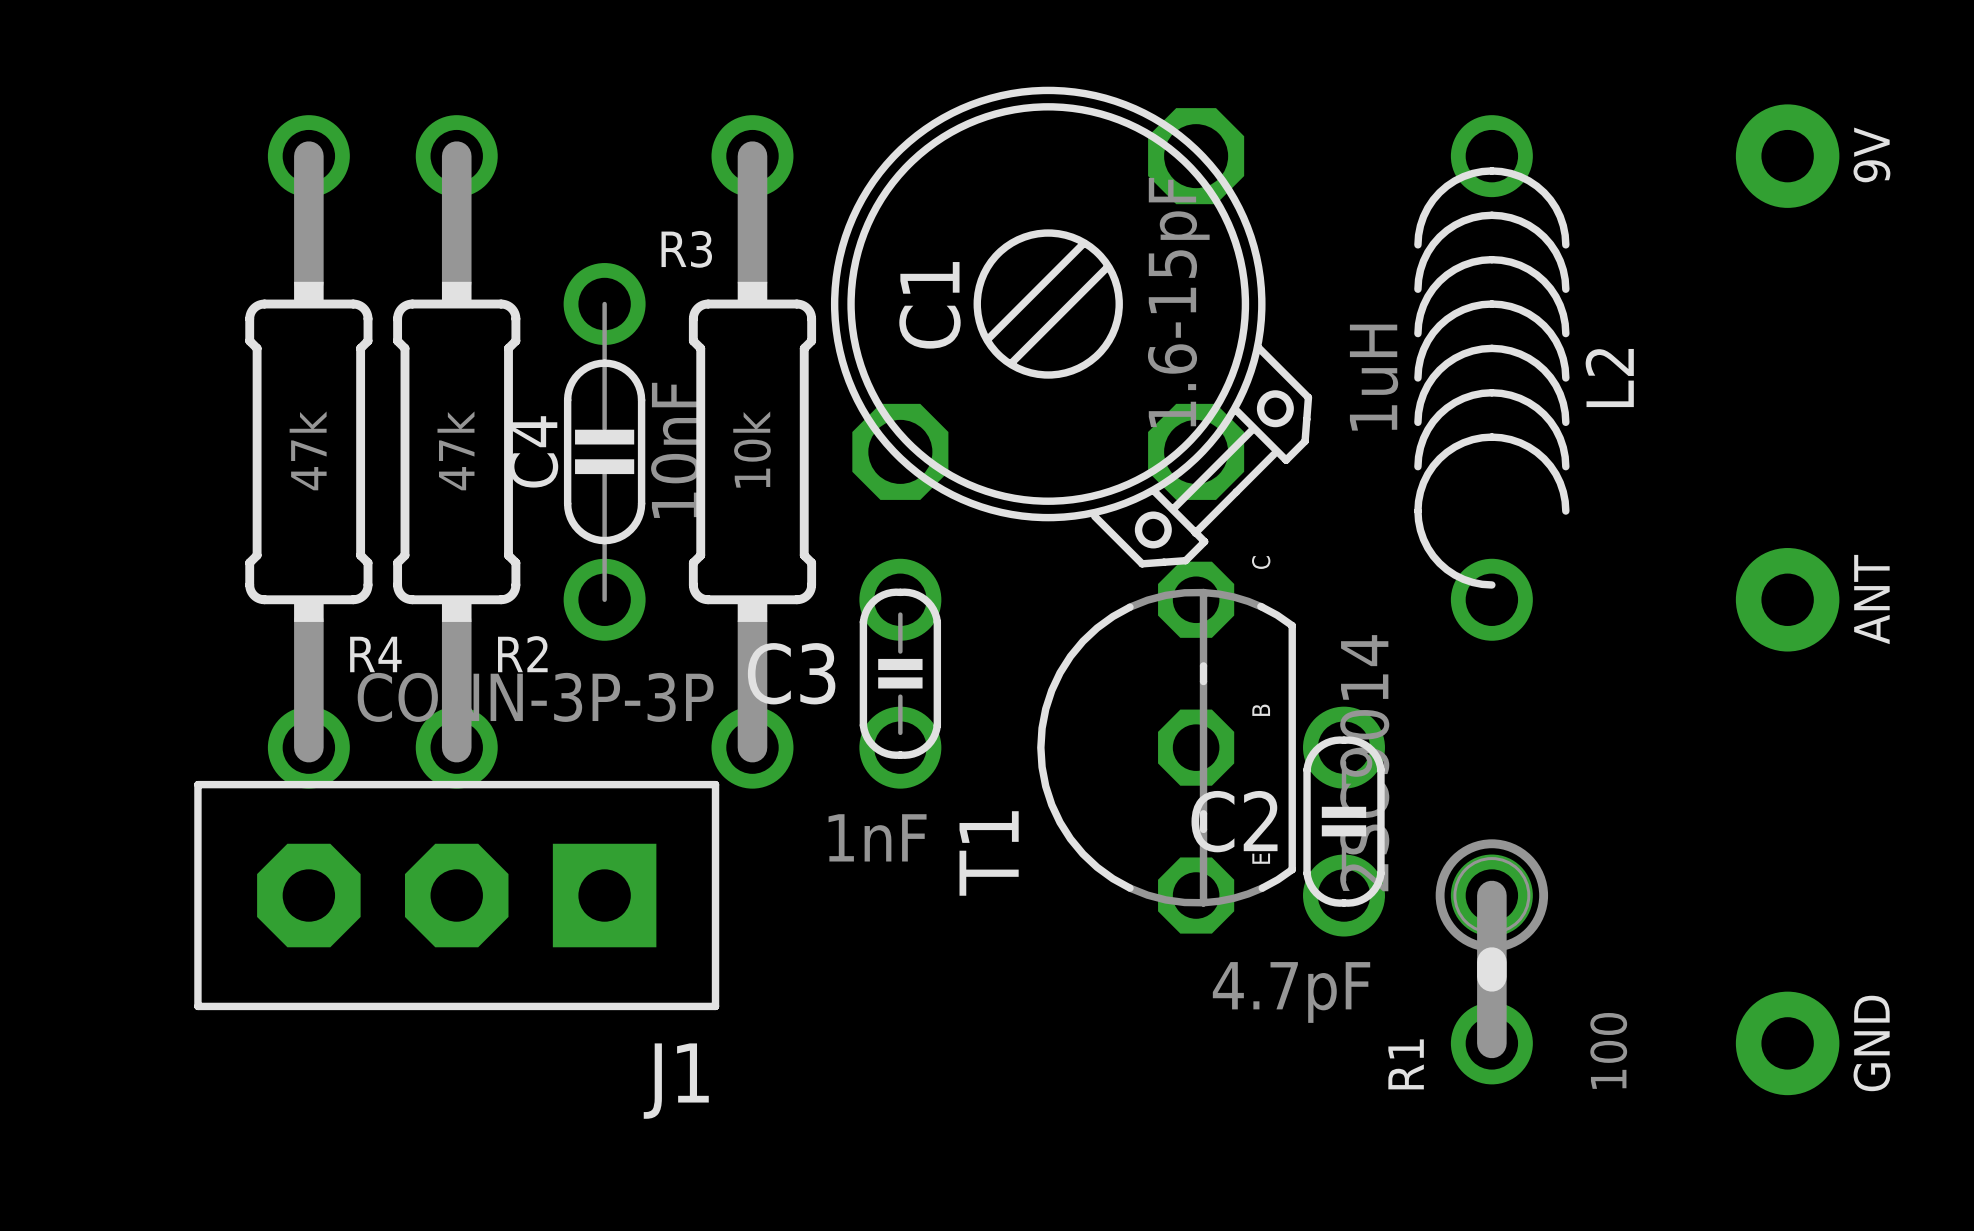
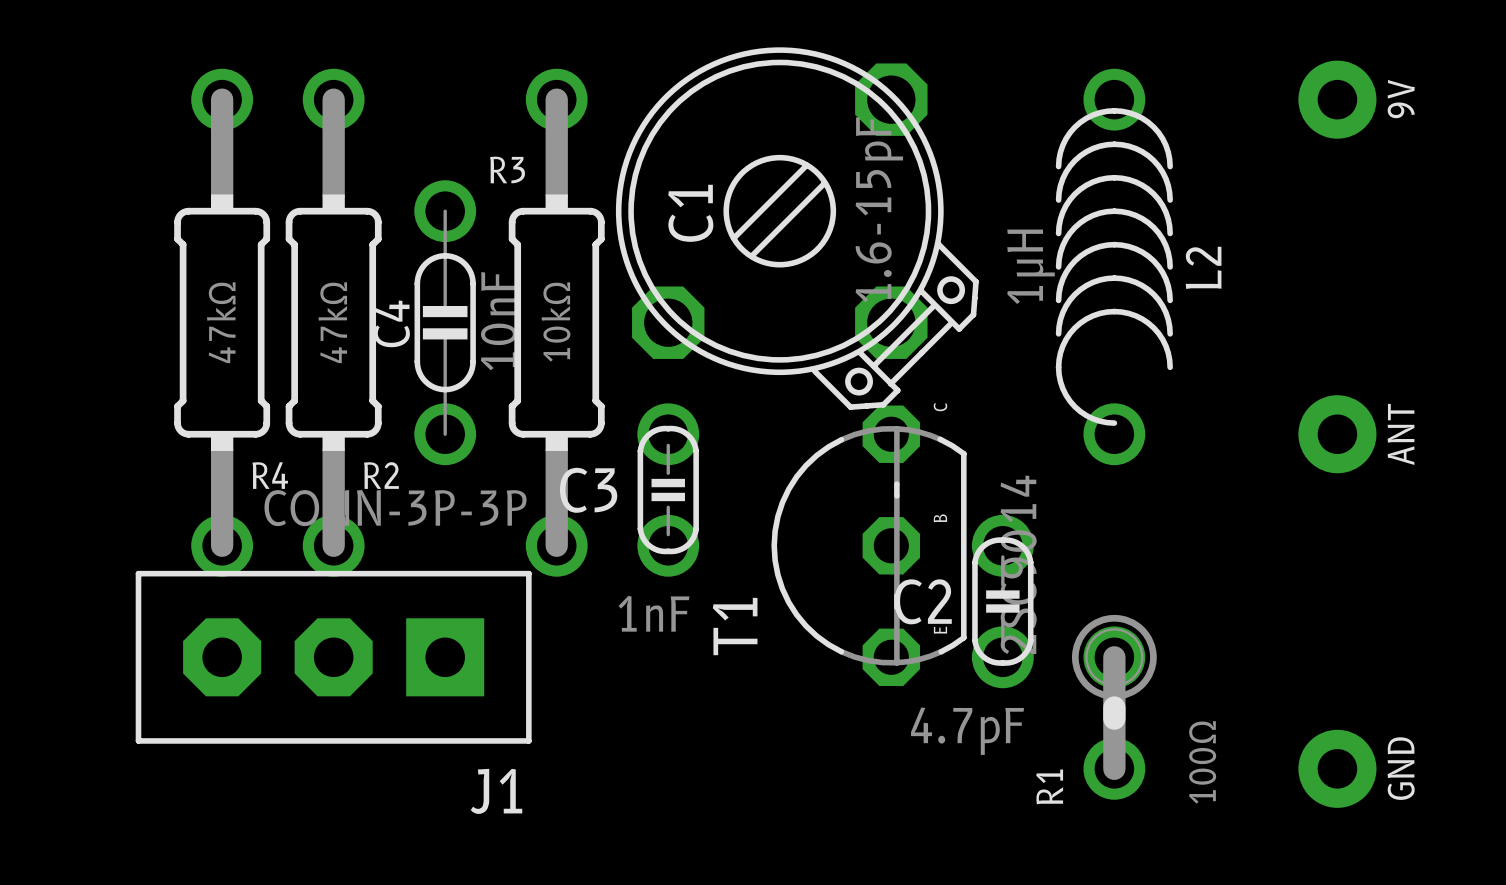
L2 value: 1uH (1374, 377) -> 1μH (1031, 266)
R3 value: 10k (752, 449) -> 10kΩ (555, 321)
R4 value: 47k (308, 450) -> 47kΩ (221, 322)
R2 value: 47k (455, 450) -> 47kΩ (332, 322)
R1 value: 100 (1608, 1050) -> 100Ω (1202, 762)

